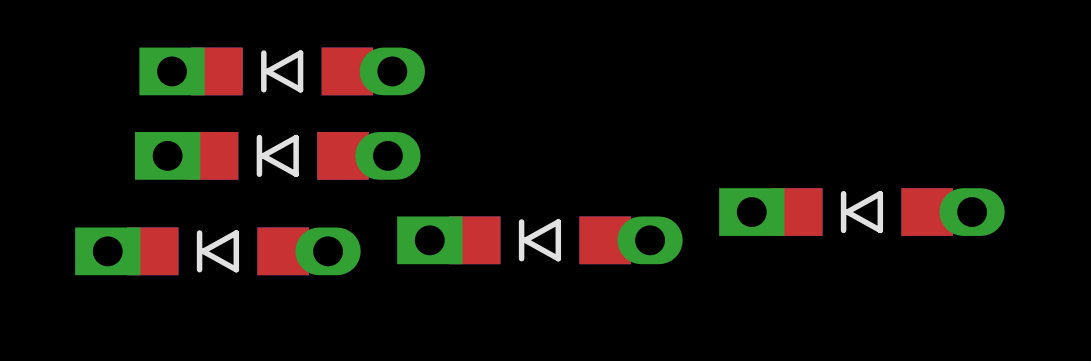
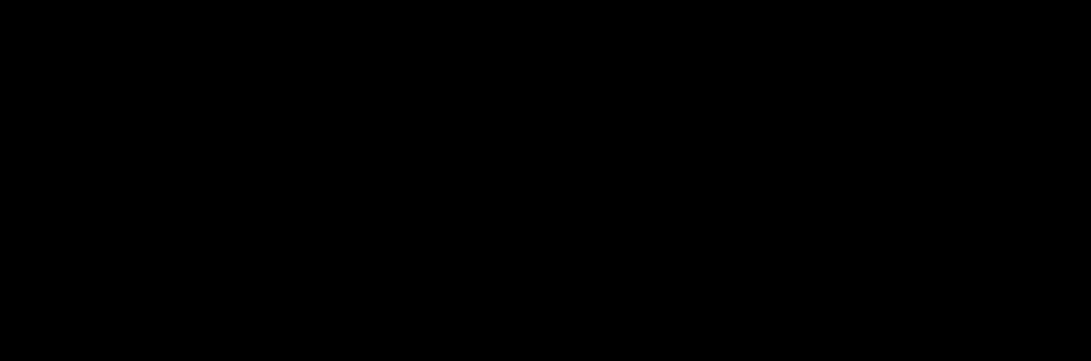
part: (282, 71) -> none
part: (277, 155) -> none
part: (861, 212) -> none
part: (539, 240) -> none
part: (217, 251) -> none

